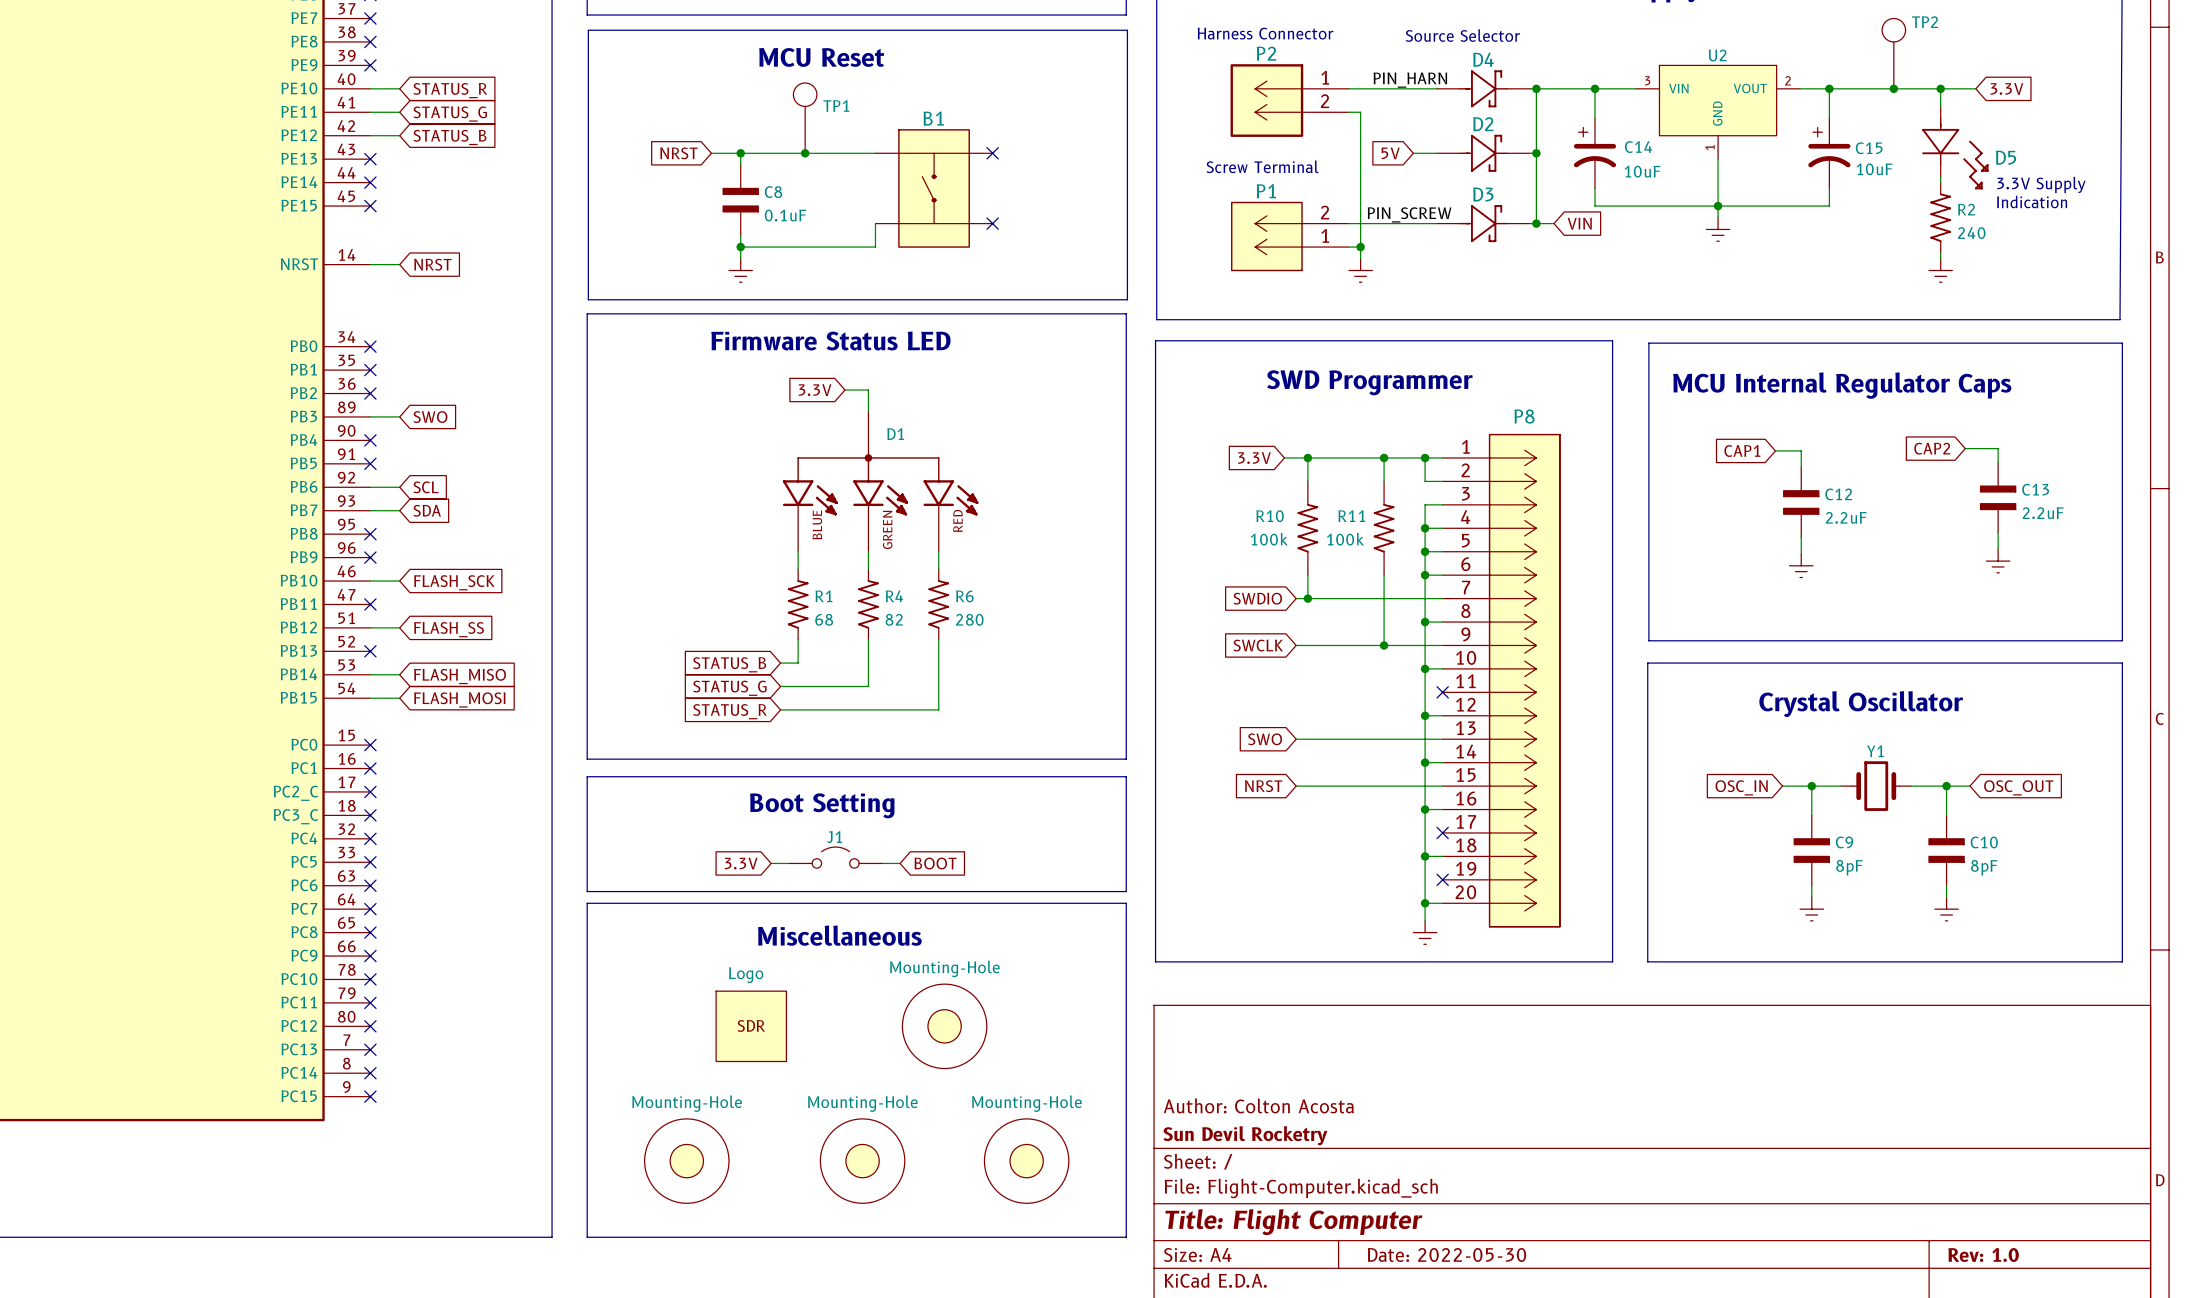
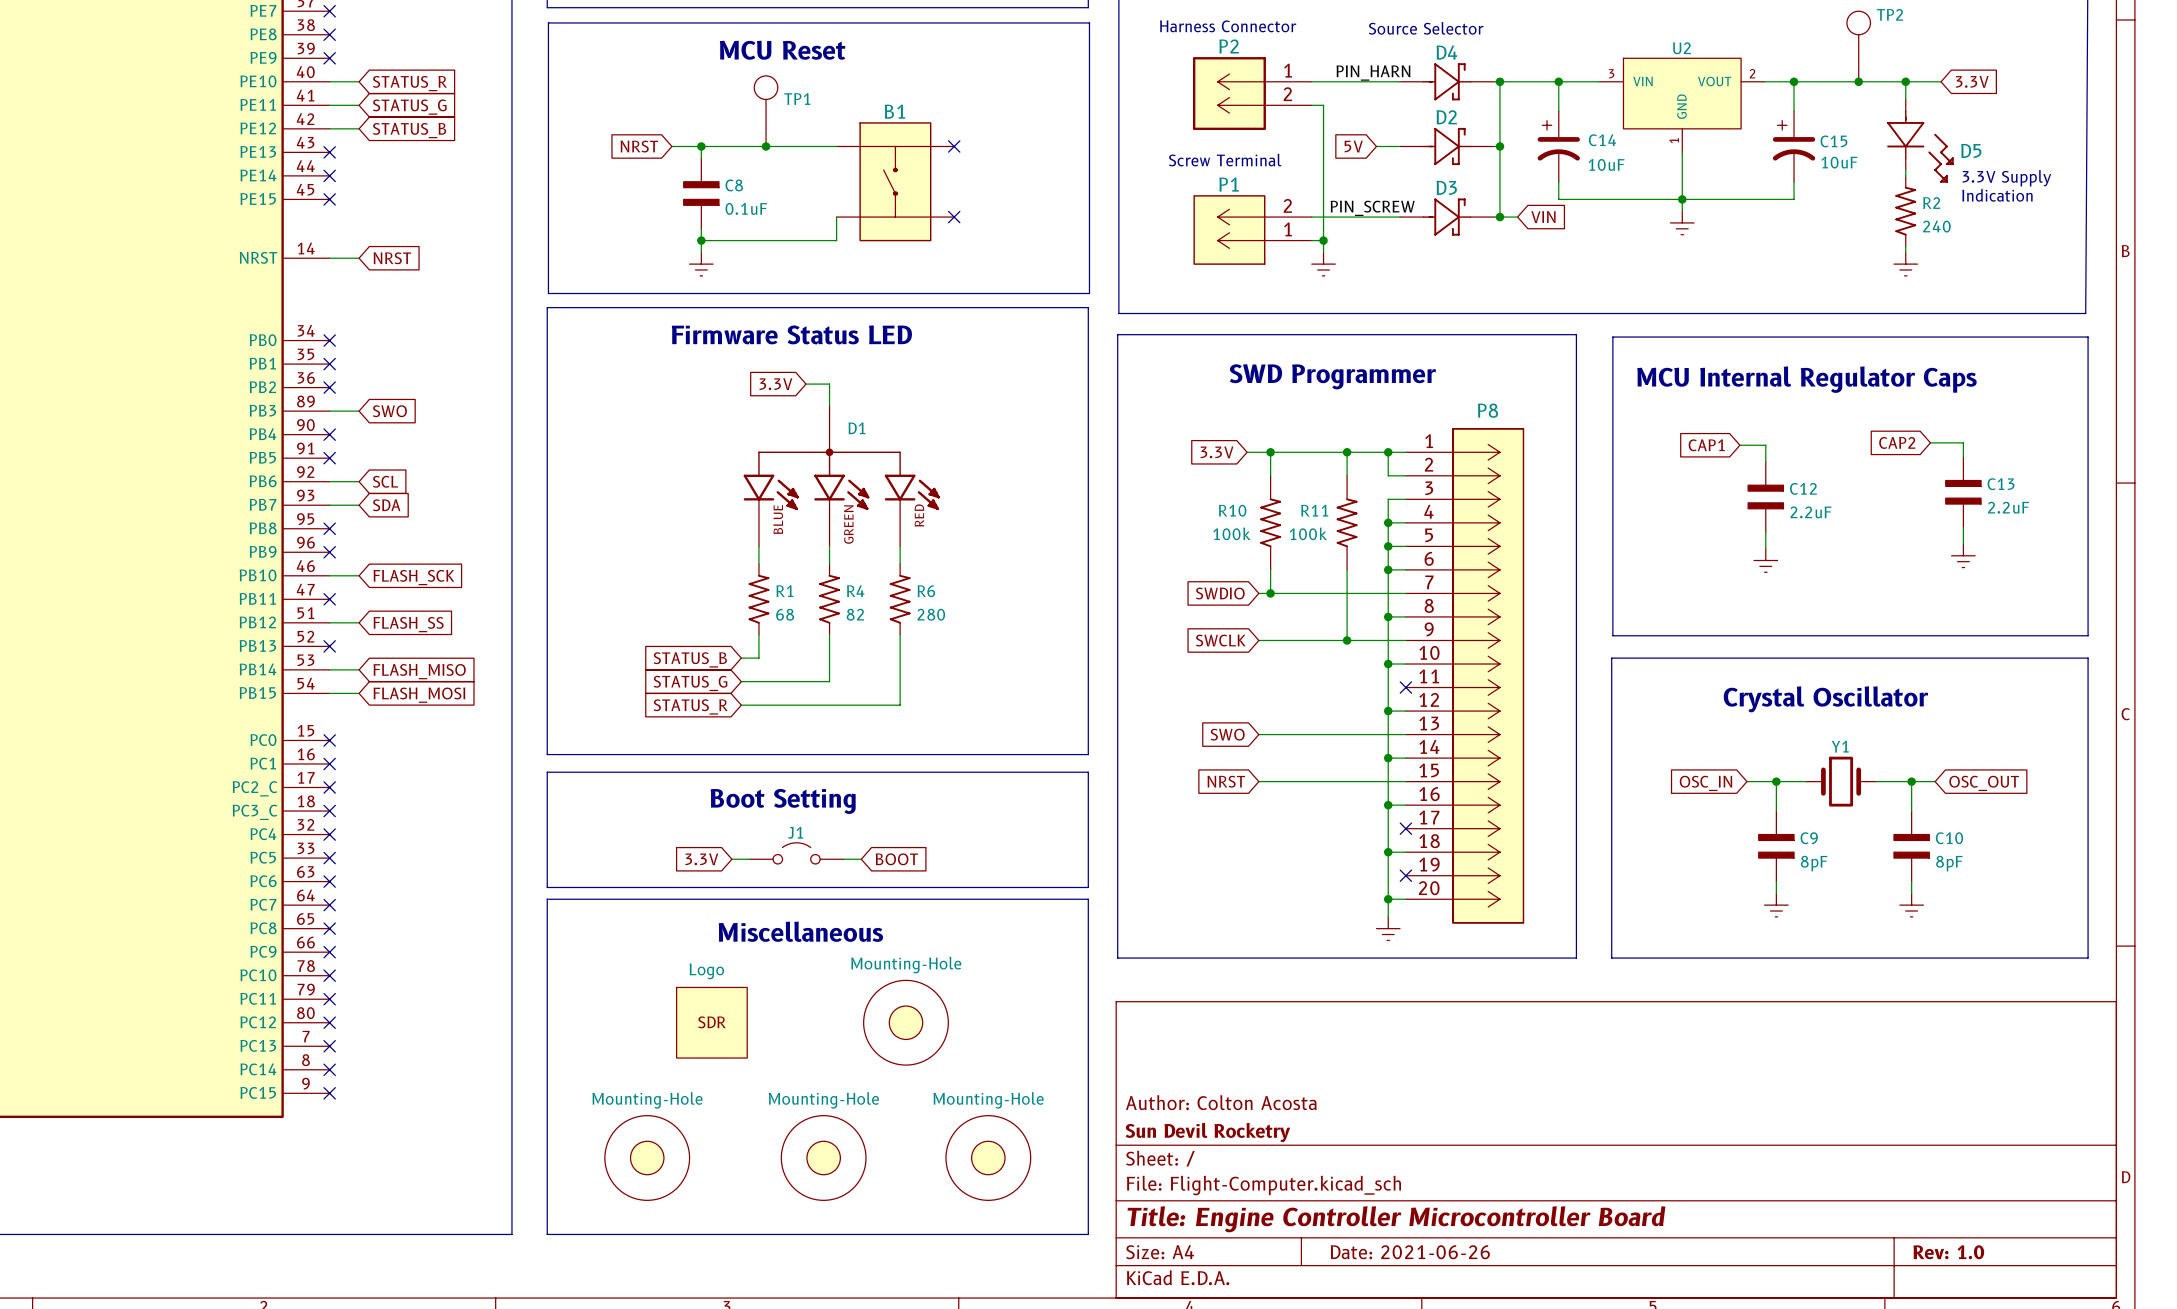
title block: Title: Flight Computer (1293, 1222) -> Title: Engine Controller Microcontroller Board (1396, 1219)
title block: Date: 2022-05-30 (1446, 1254) -> Date: 2021-06-26 (1410, 1252)

